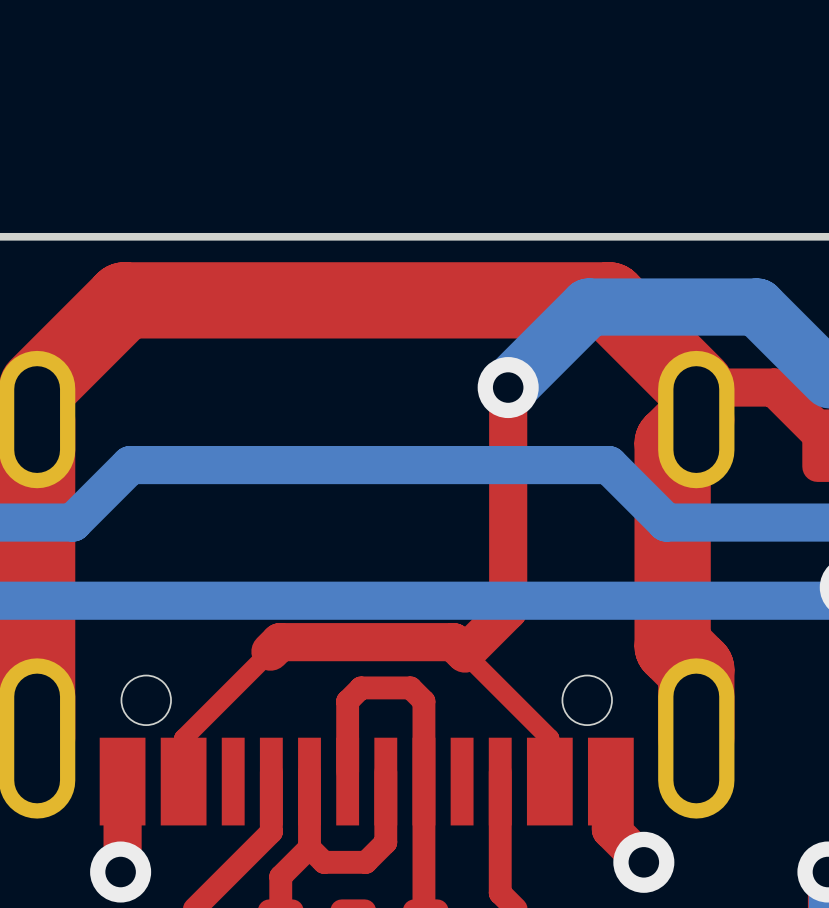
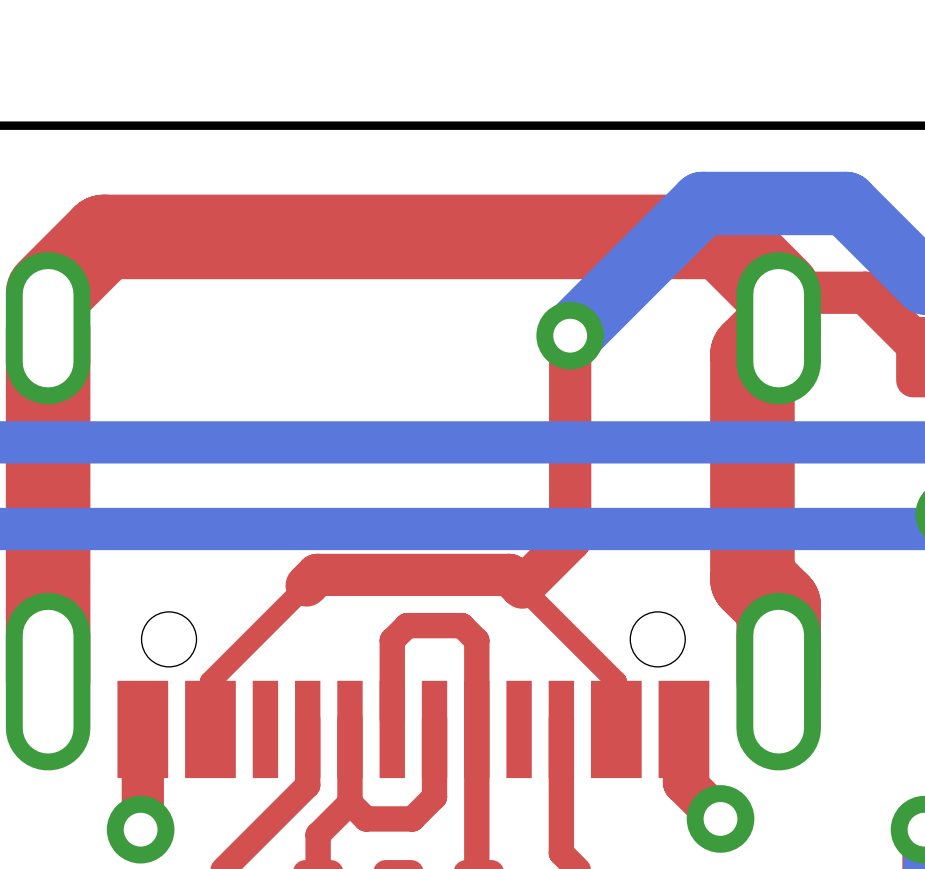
bottom track: (627, 307) (588, 307) (508, 387) -> (702, 203) (570, 335)
top track: (645, 337) (609, 300) (124, 300) (87, 337) -> (722, 236) (103, 236)
via position: (508, 387) -> (570, 335)
bottom track: (666, 522) (608, 465) (130, 465) (72, 522) -> (745, 442) (87, 442)

